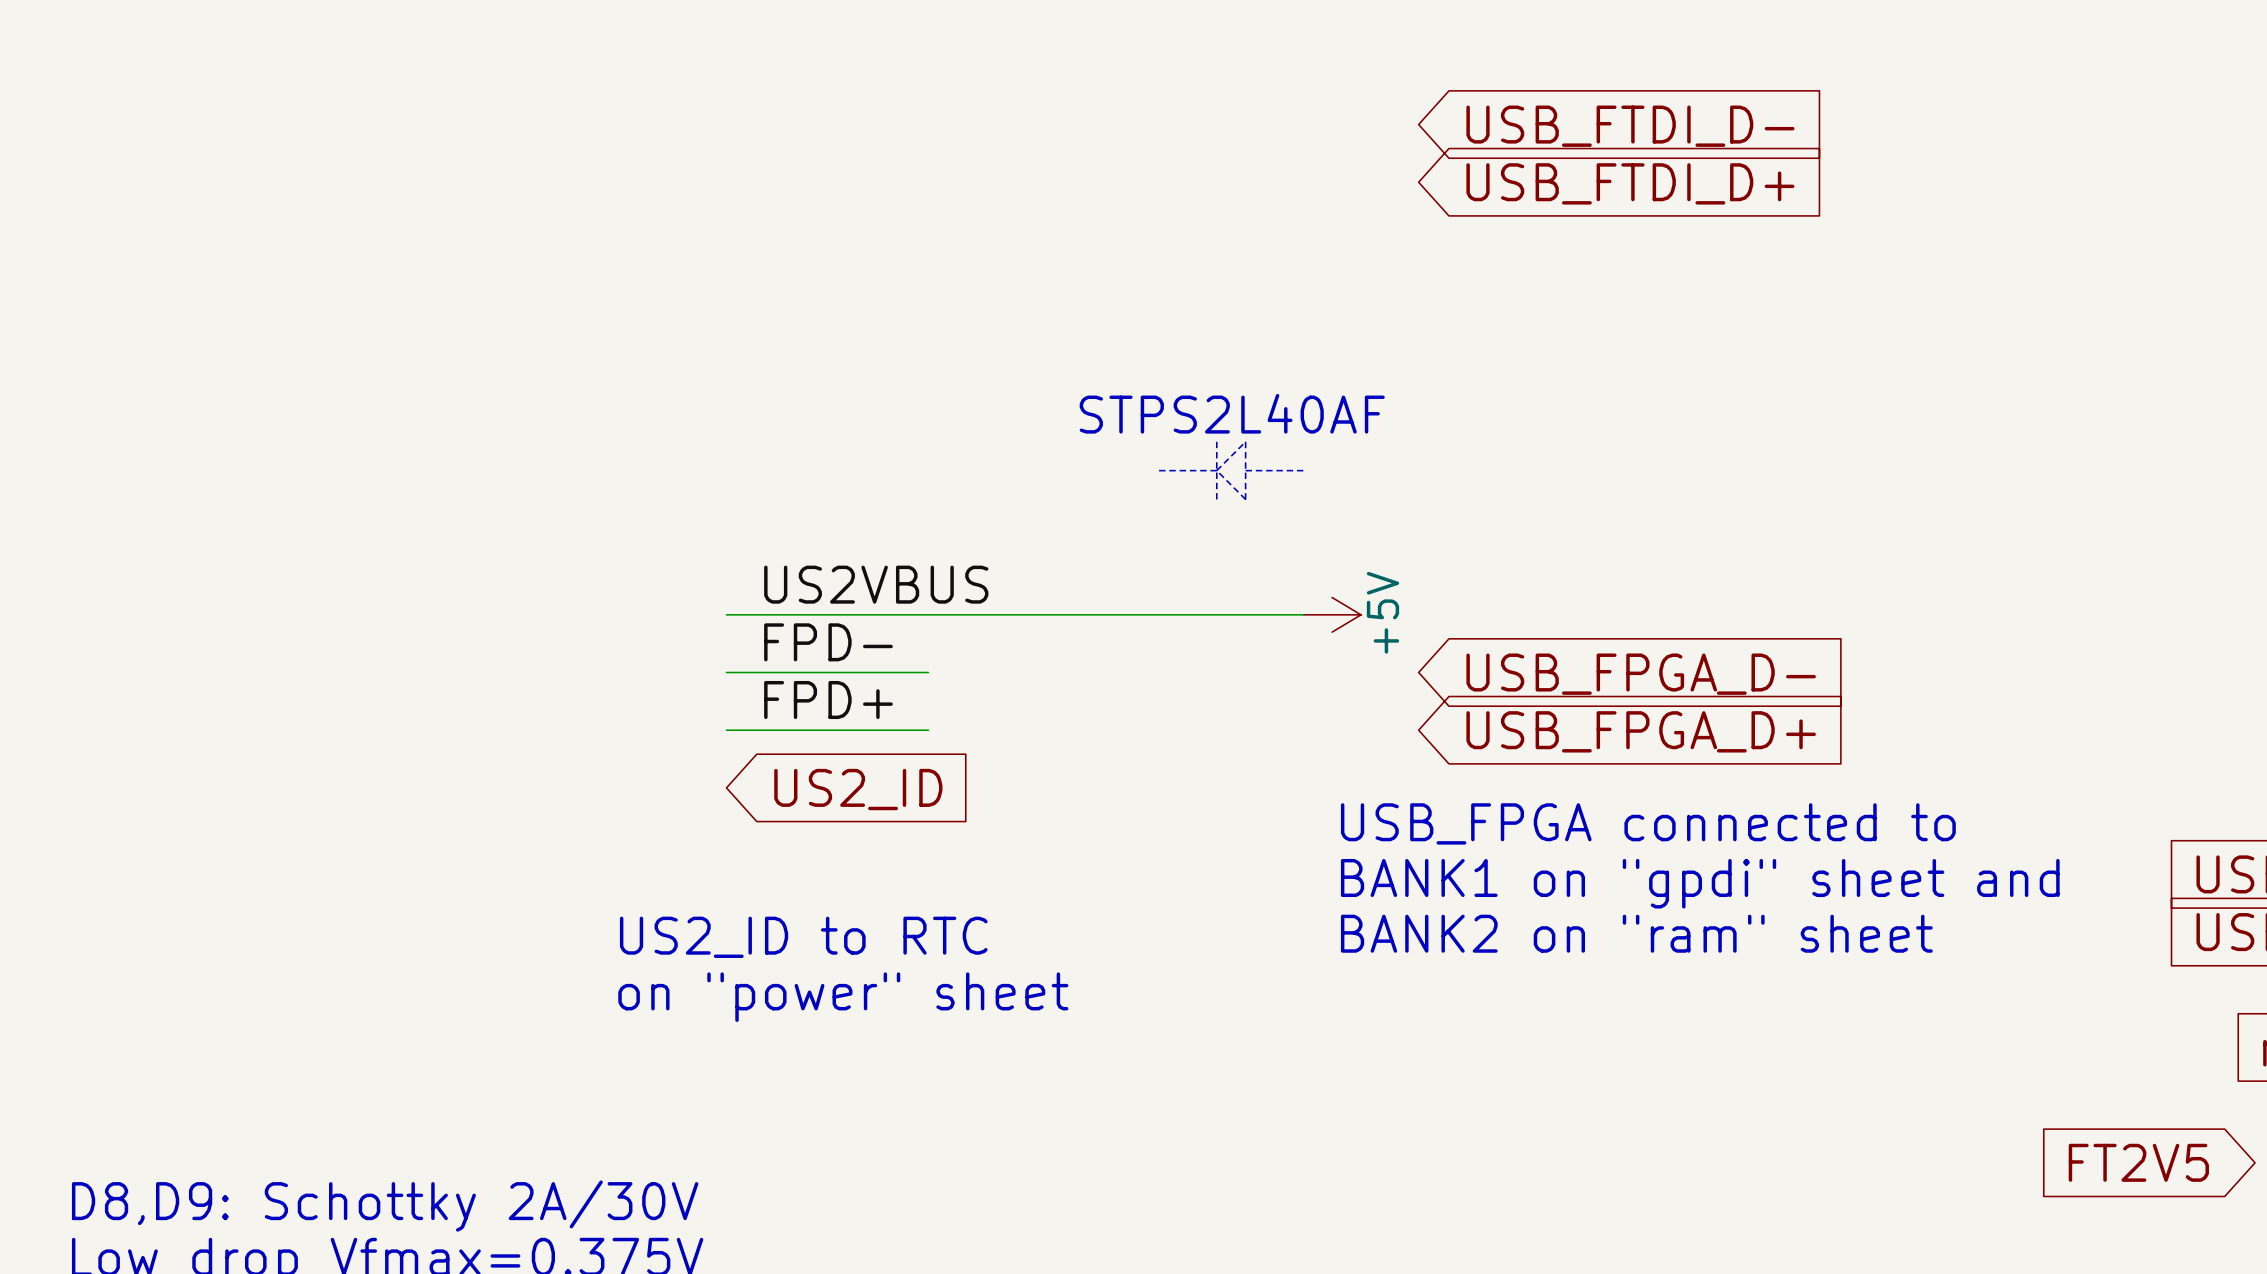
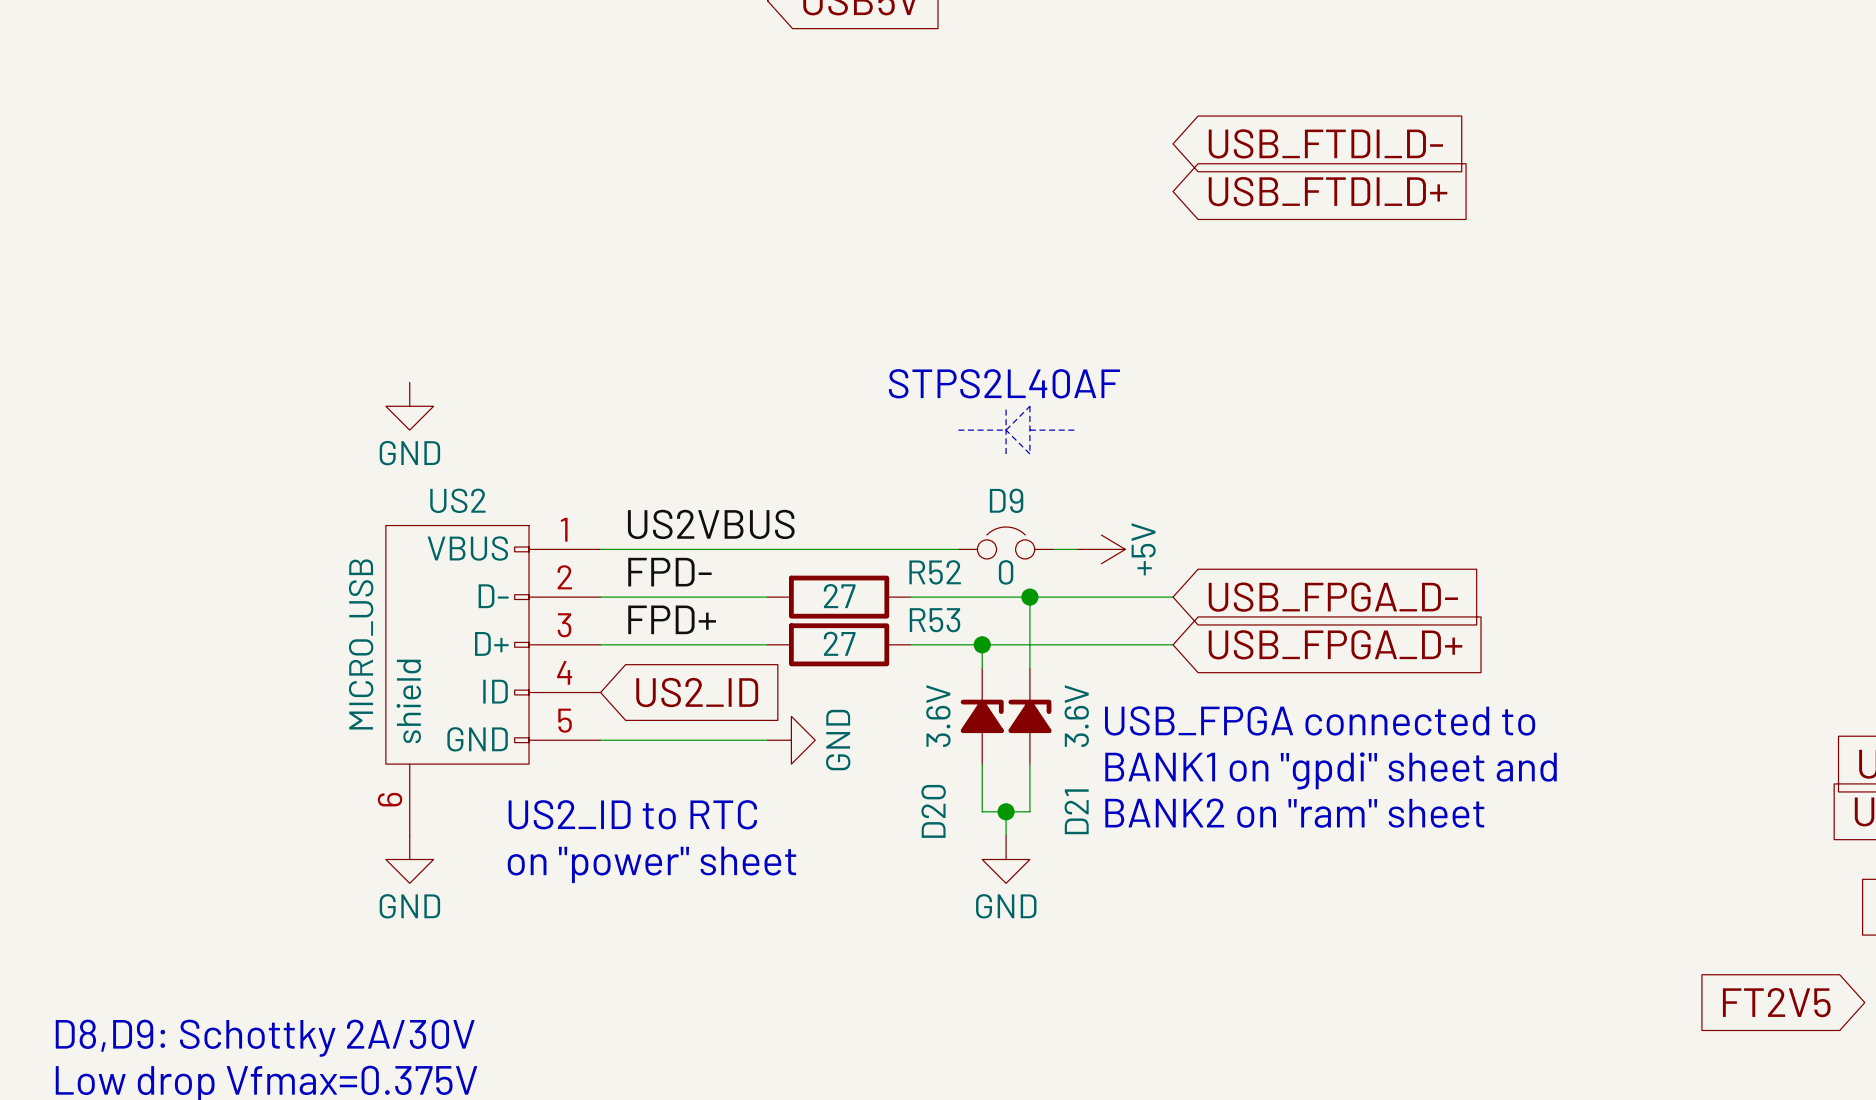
power symbol: none -> GND (409, 406)
D9: none -> 0 (1006, 542)
wire: (1159, 614) (1274, 614) -> none
R52: none -> 27 (839, 597)
wire: none -> (910, 597) (1173, 597)
wire: none -> (1029, 597) (1029, 668)
junction: none -> (1029, 597)
R53: none -> 27 (839, 644)
wire: none -> (910, 644) (1173, 644)
wire: none -> (982, 644) (982, 668)
junction: none -> (982, 644)
US2: none -> MICRO_USB (493, 680)
D20: none -> 3.6V (982, 716)
D21: none -> 3.6V (1029, 716)
wire: none -> (600, 740) (767, 740)
power symbol: none -> GND (791, 740)
wire: none -> (982, 764) (982, 811) (1029, 811) (1029, 764)
wire: none -> (1006, 811) (1006, 835)
junction: none -> (1006, 811)
power symbol: none -> GND (409, 859)
power symbol: none -> GND (1006, 859)

